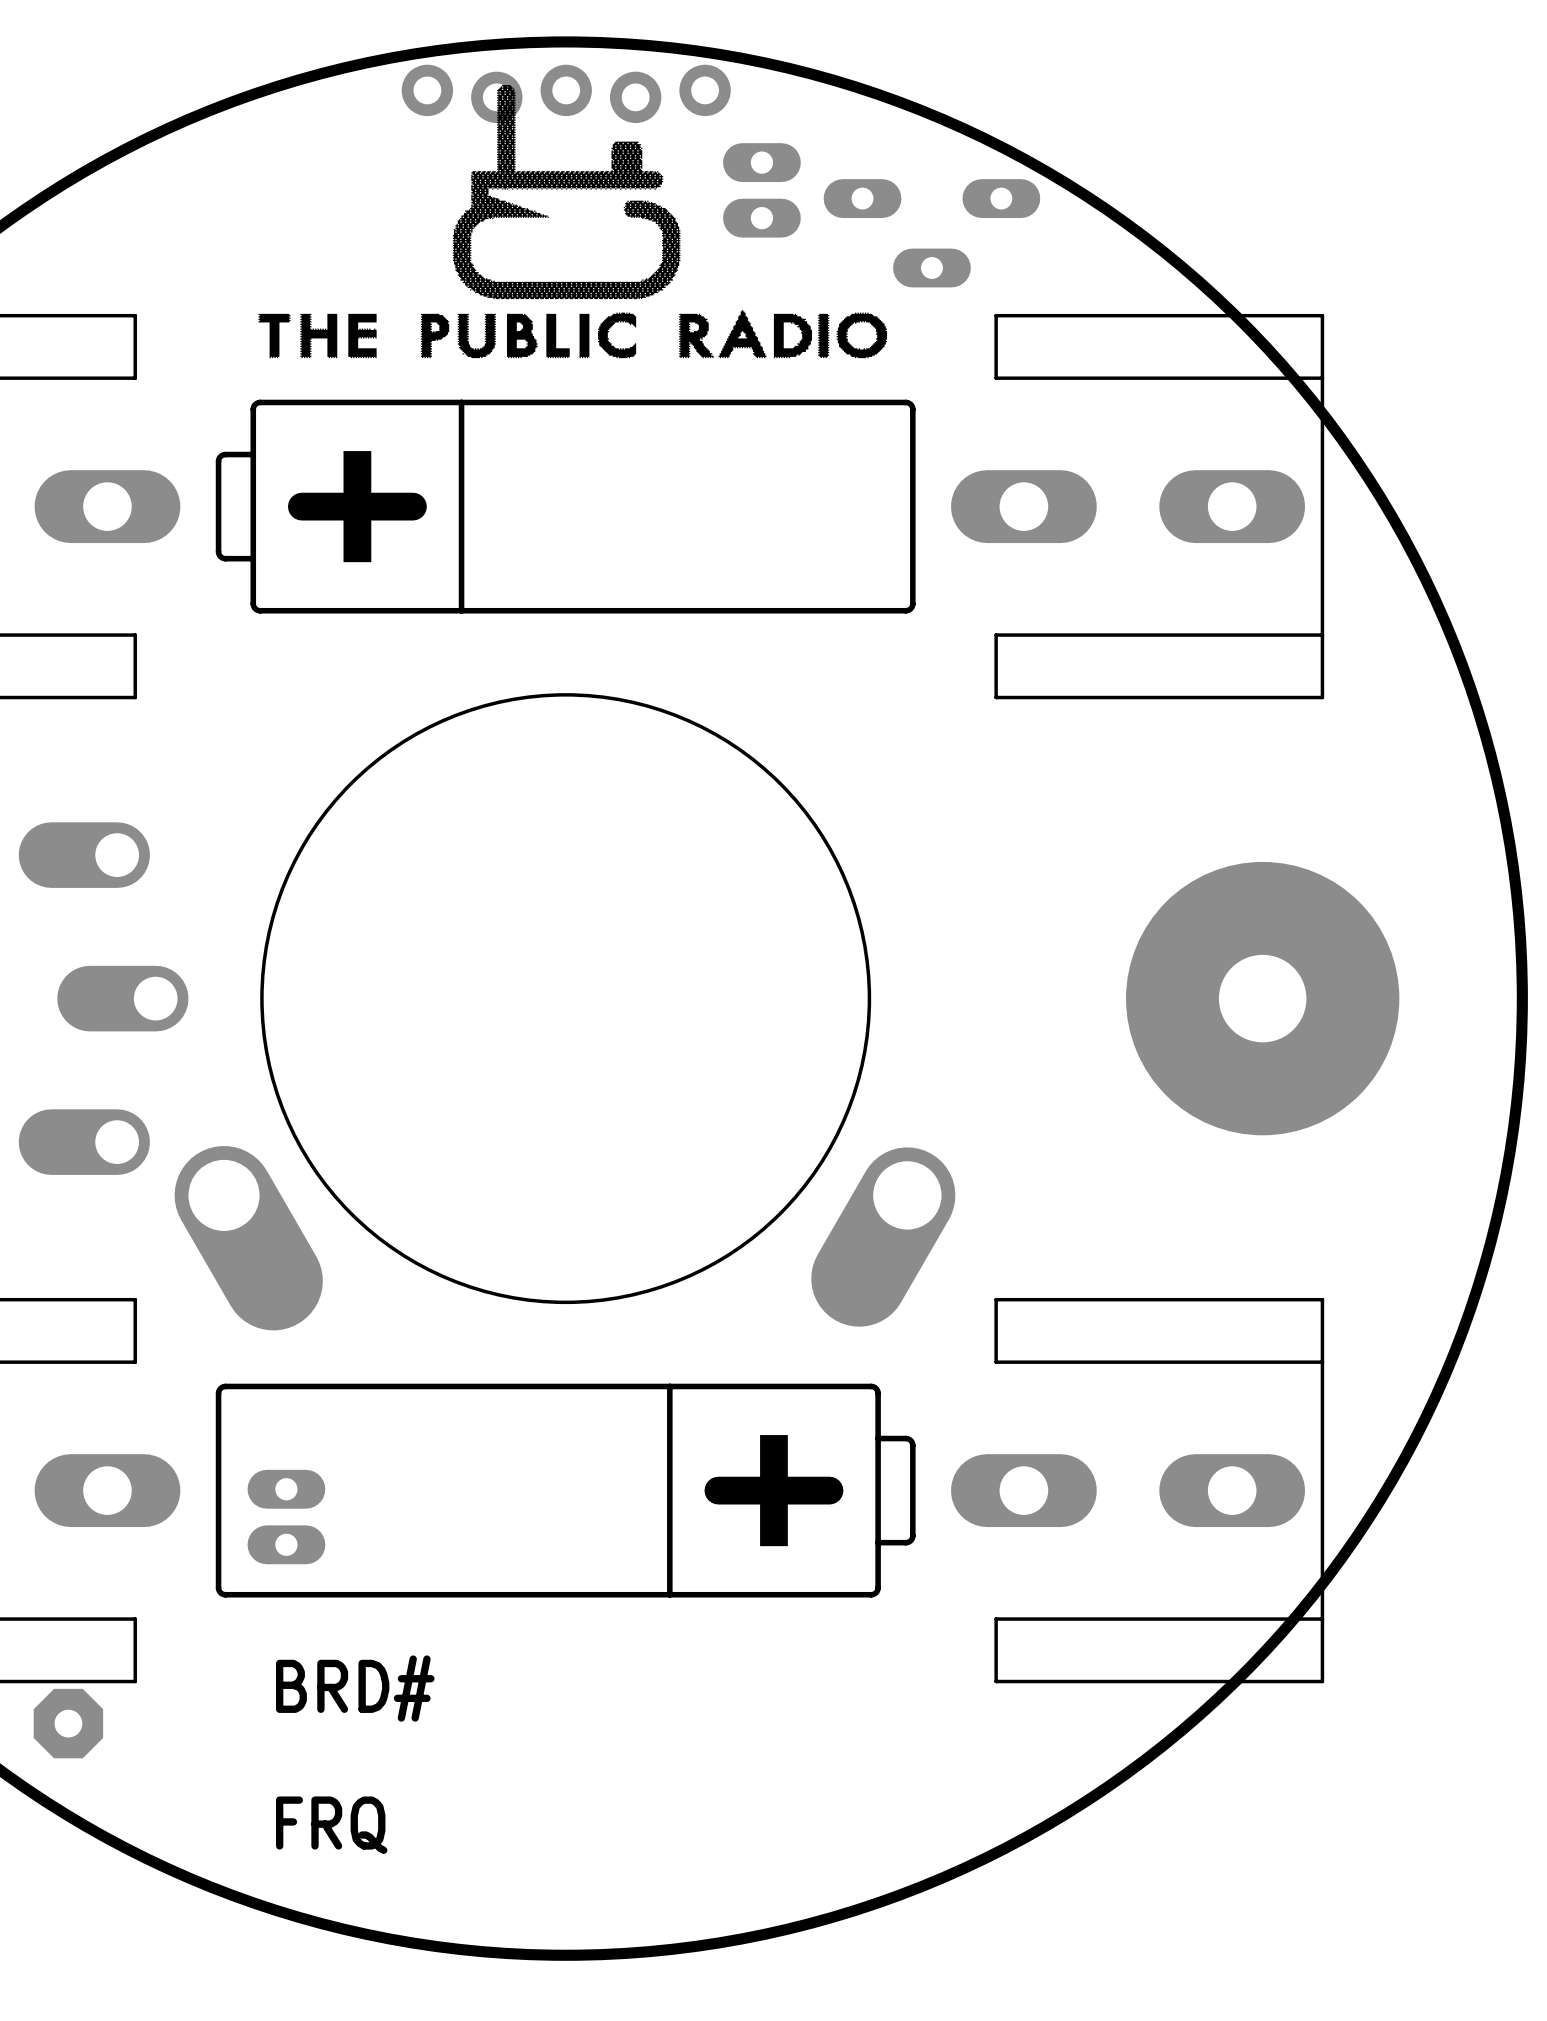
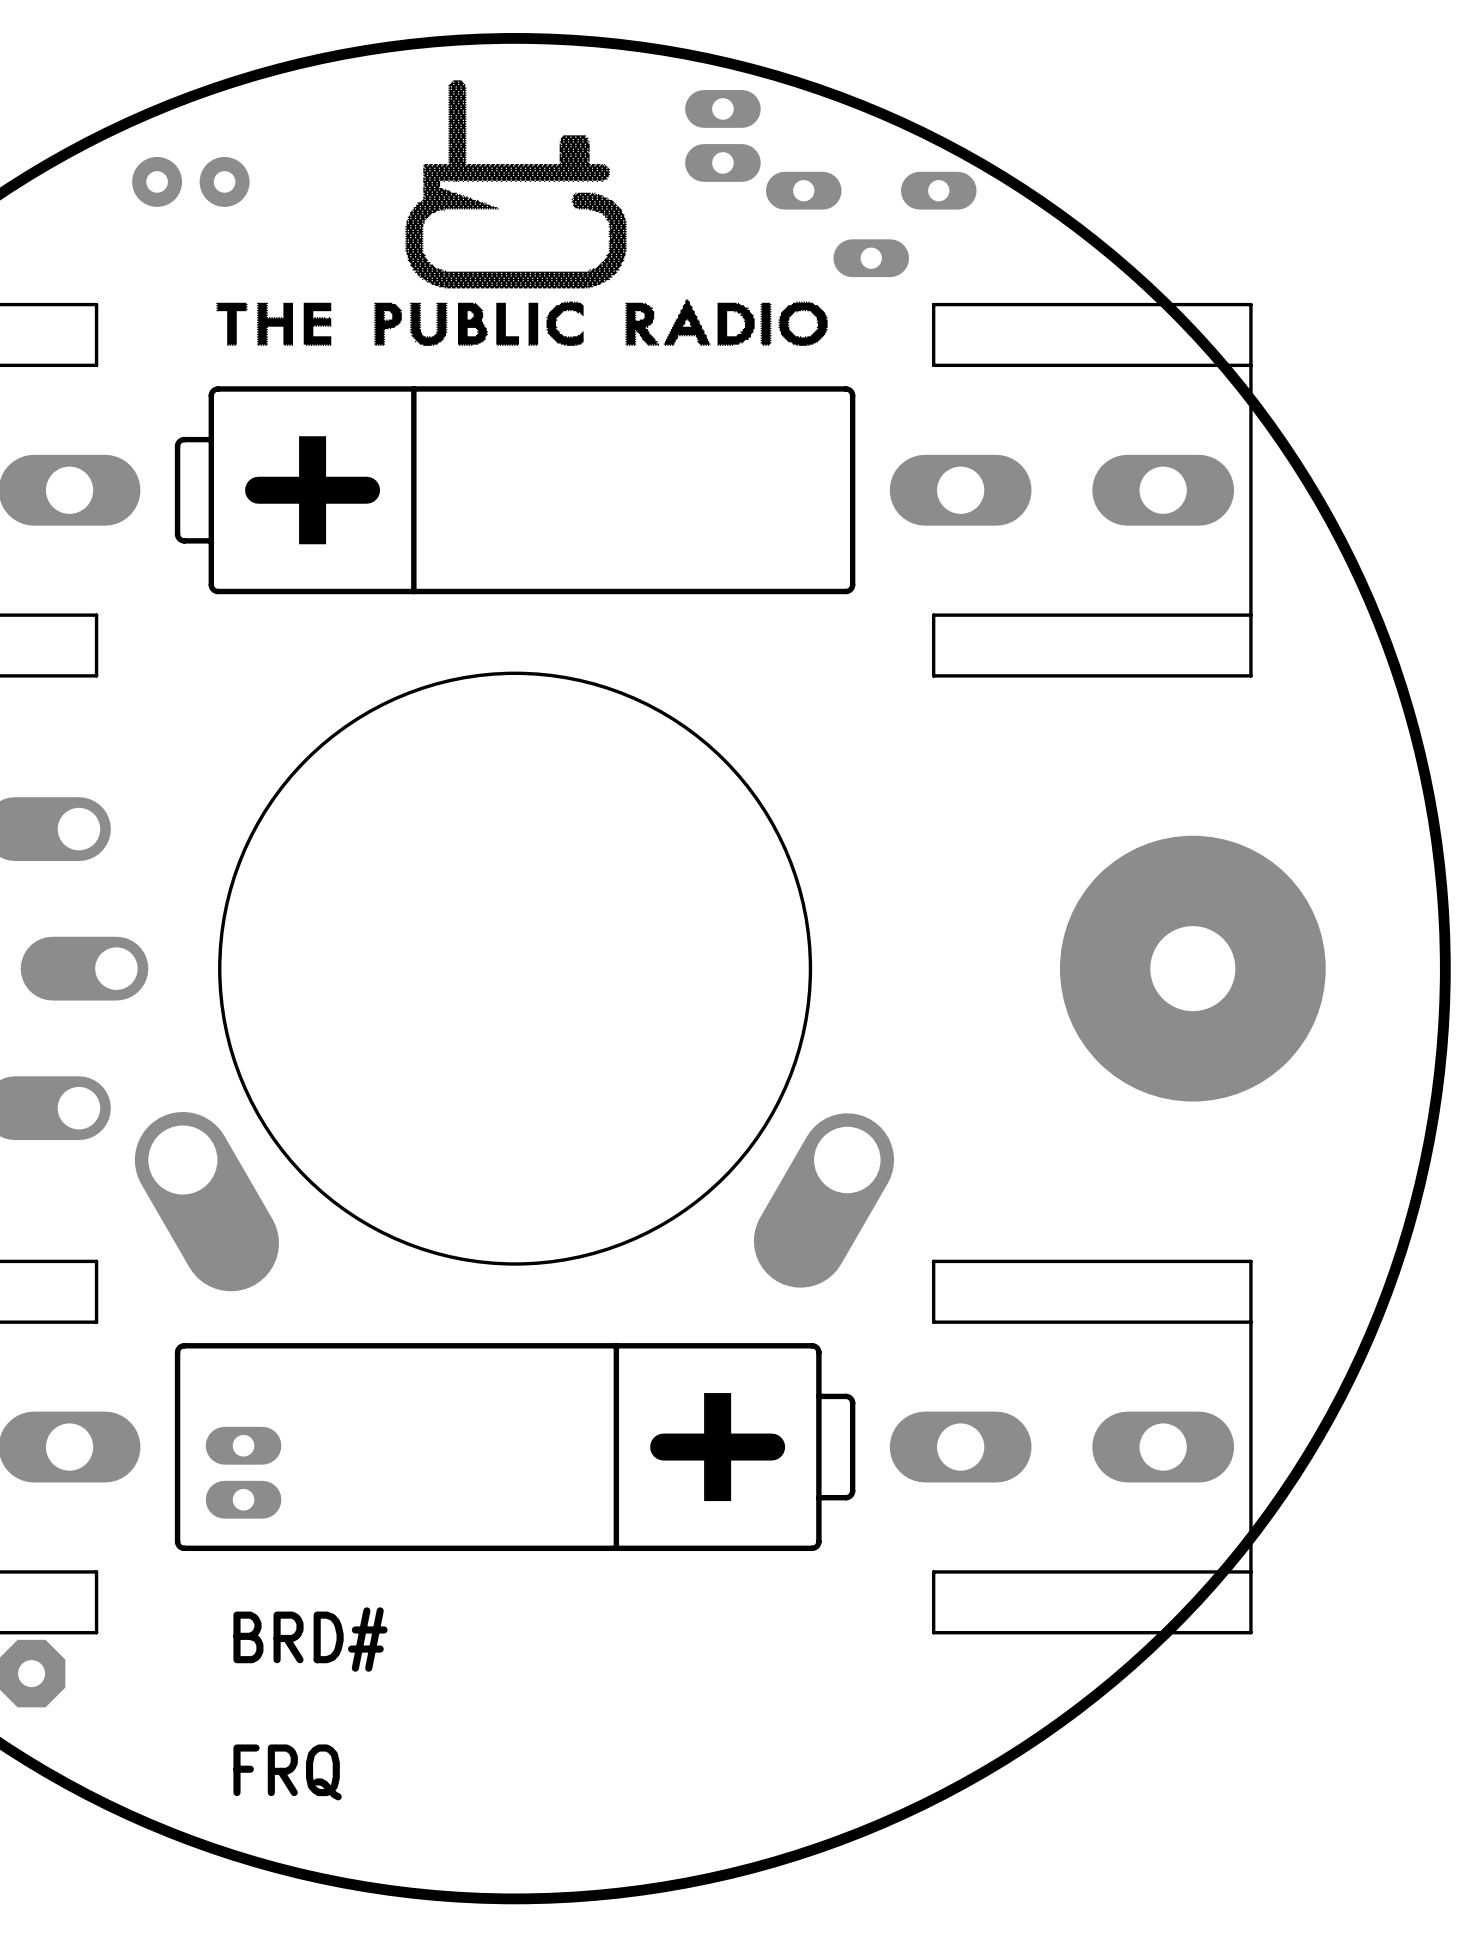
part: (566, 93) -> none
part: none -> (190, 181)
part position: (761, 190) -> (722, 135)

